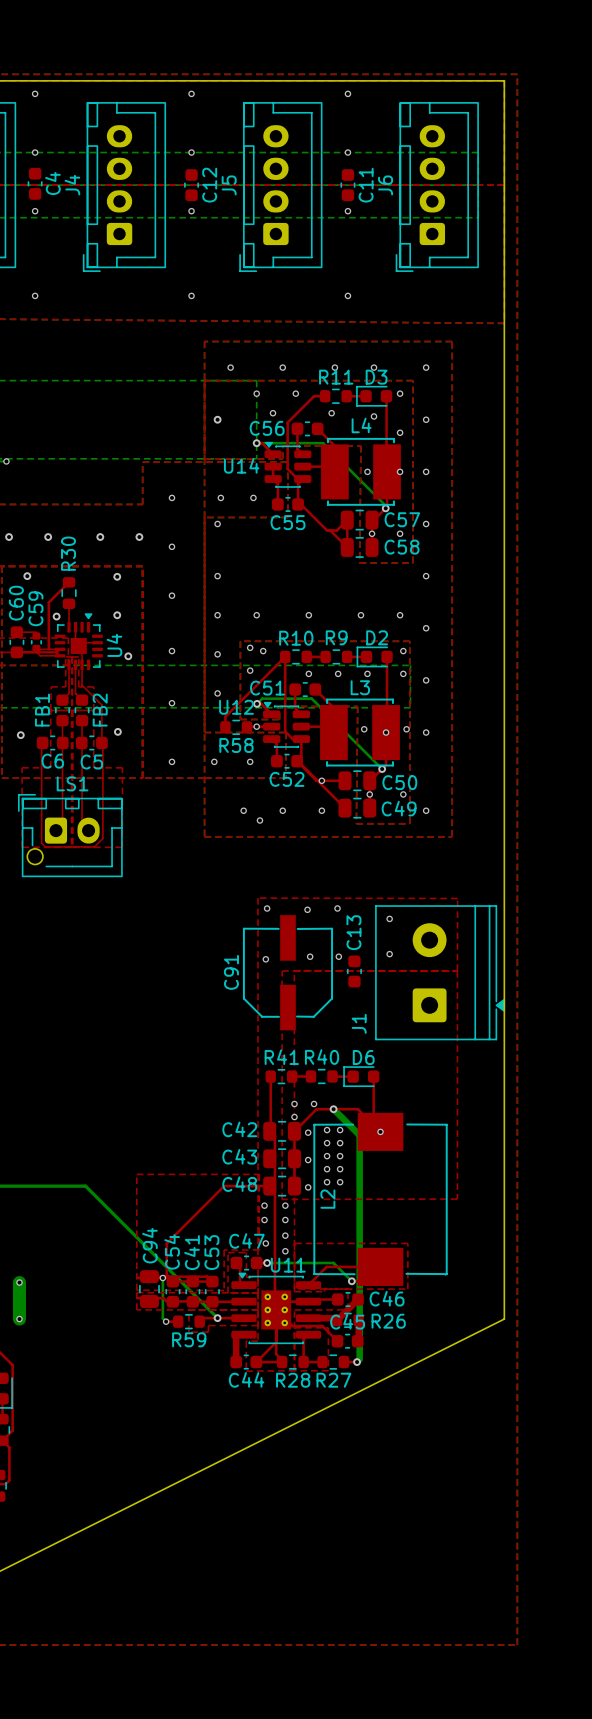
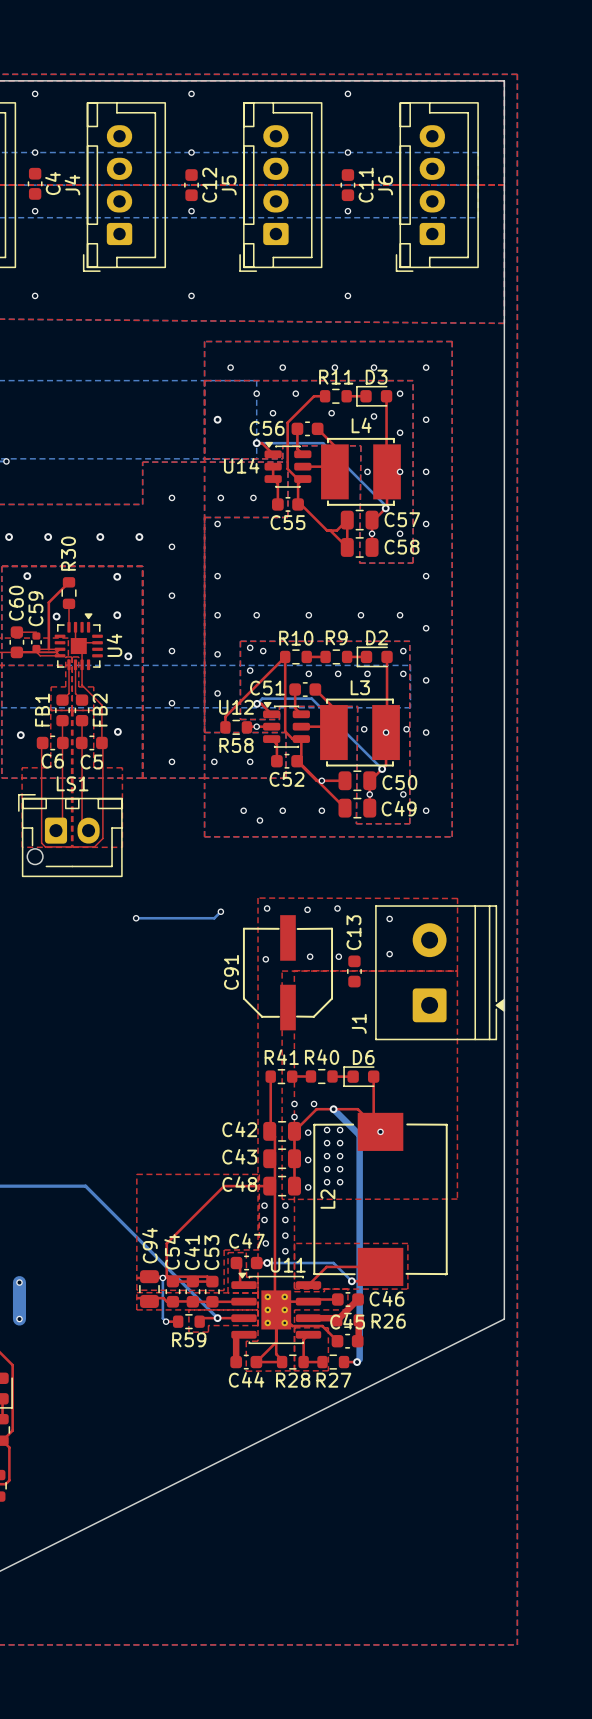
bottom track: none -> (220, 911) (214, 918) (136, 918)
via: none -> (220, 911)
via: none -> (136, 918)

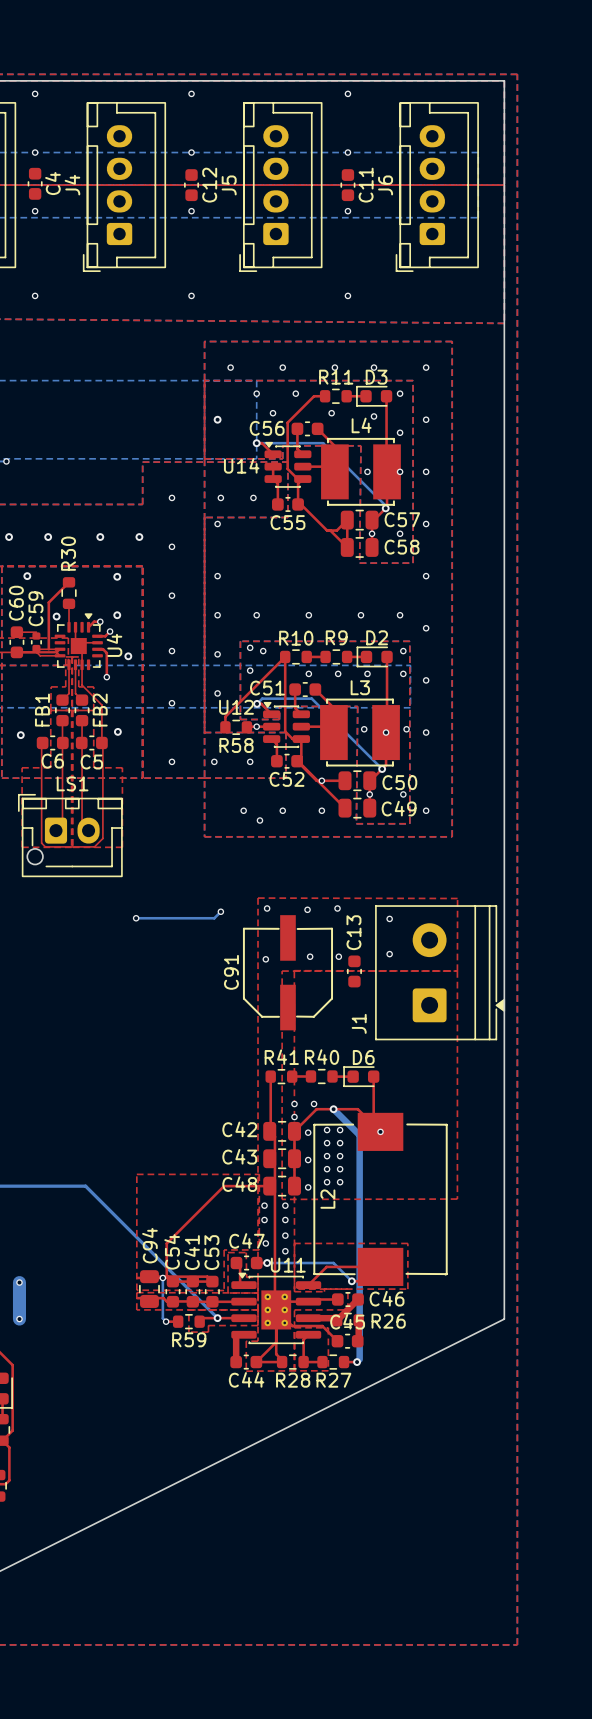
top track: none -> (100, 621) (94, 621) (88, 627)
via: none -> (100, 621)
top track: none -> (110, 631) (105, 636) (97, 636)
via: none -> (110, 631)
top track: none -> (97, 649) (103, 649) (106, 653) (106, 677)
via: none -> (106, 677)

